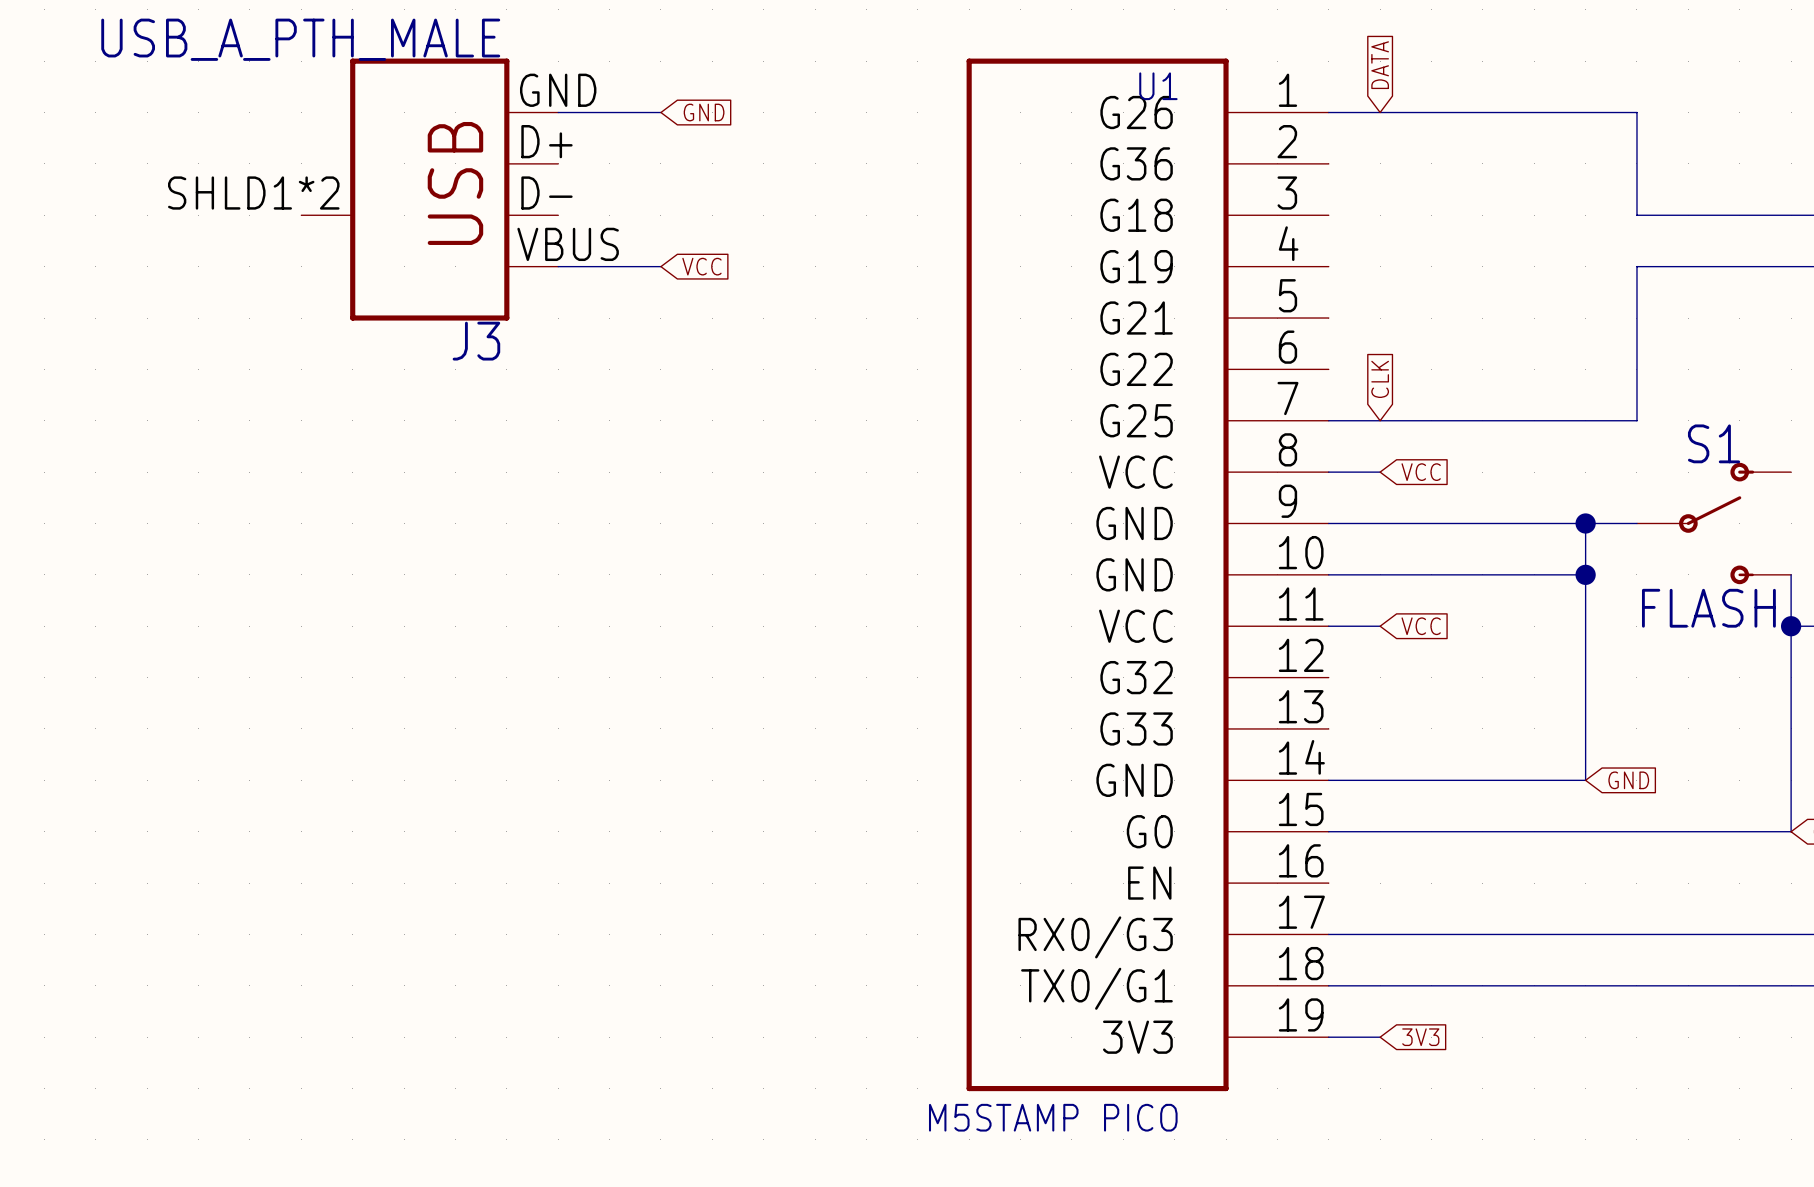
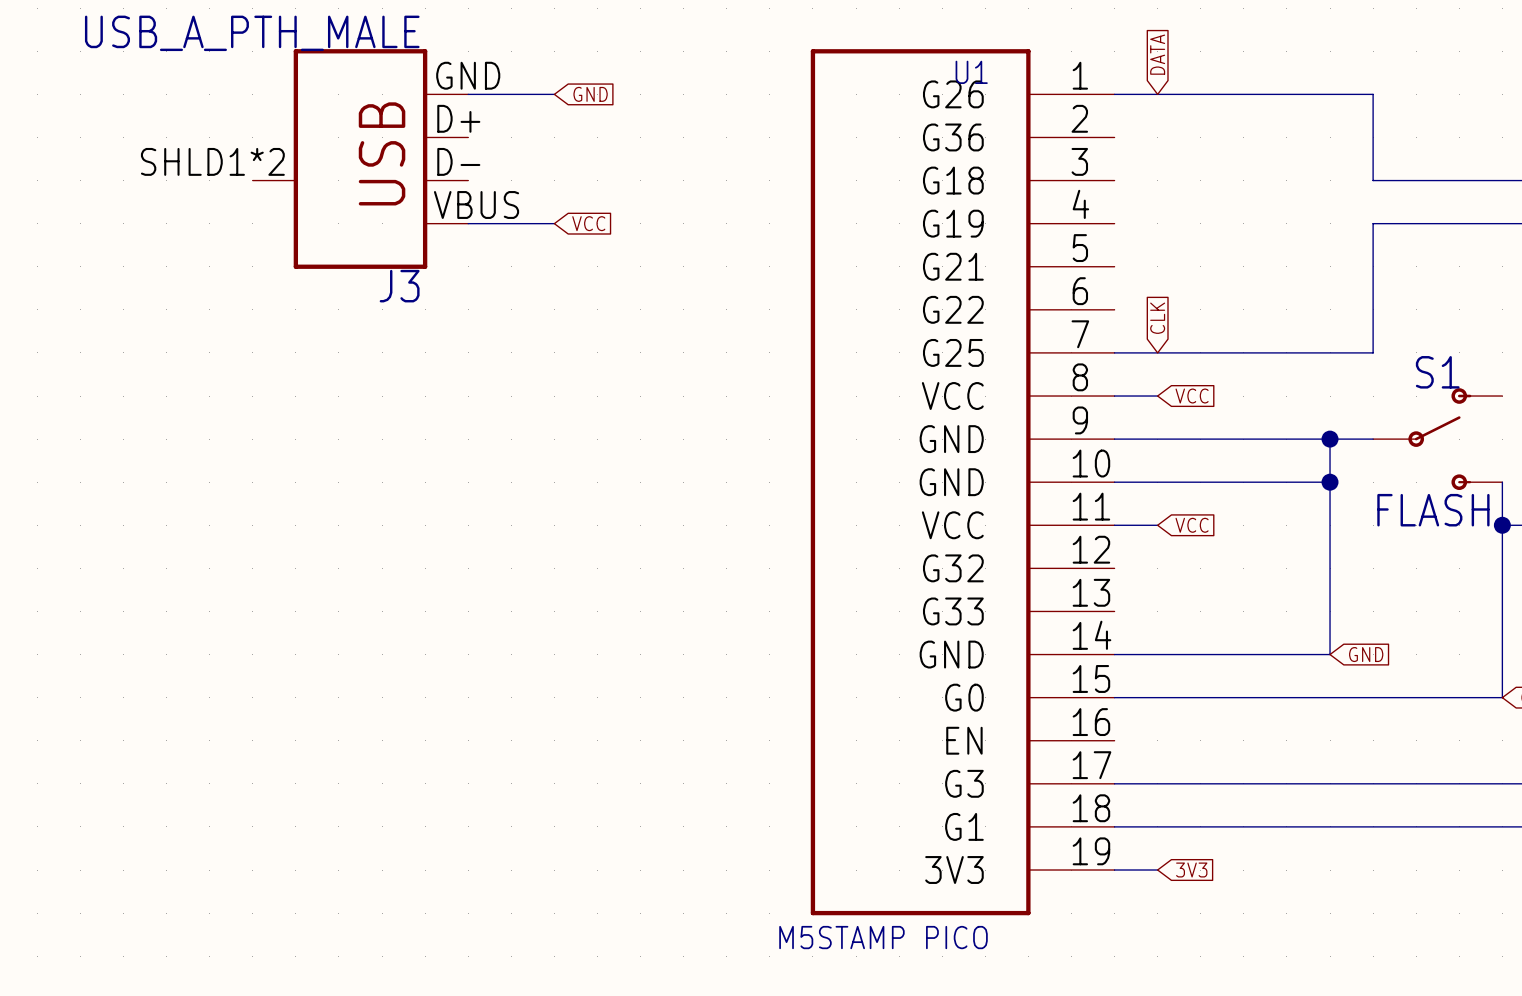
U1 pin name: RX0/G3 (1095, 937) -> G3 (964, 783)
U1 pin name: TX0/G1 (1096, 988) -> G1 (964, 826)

